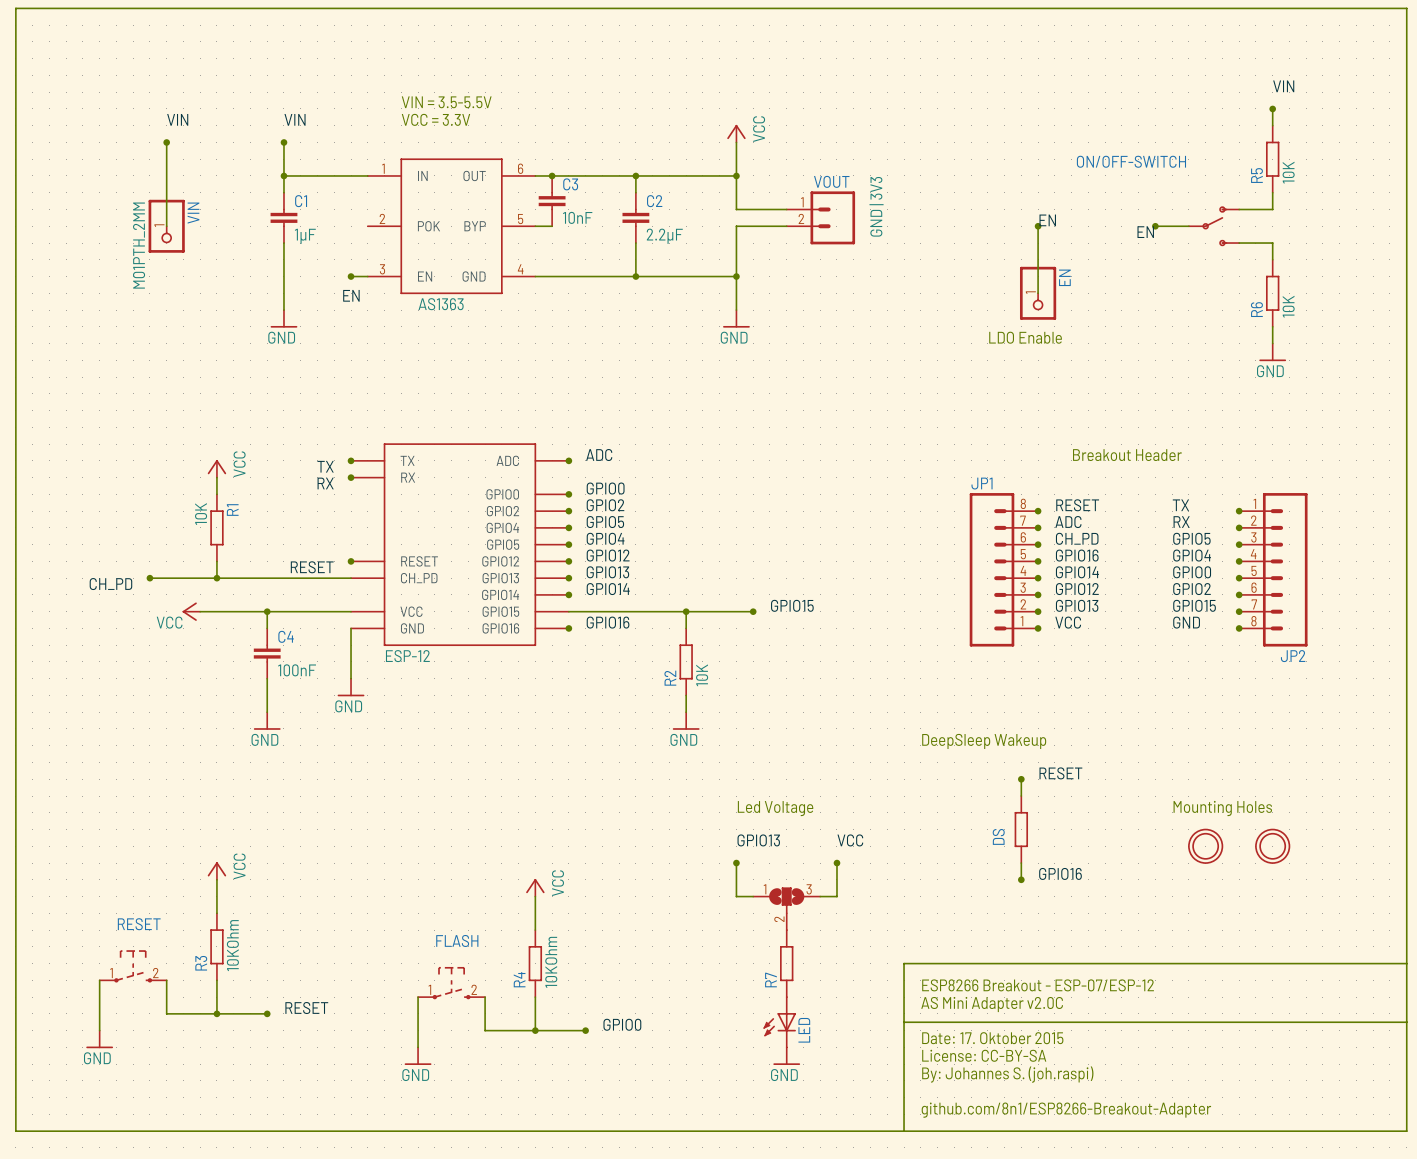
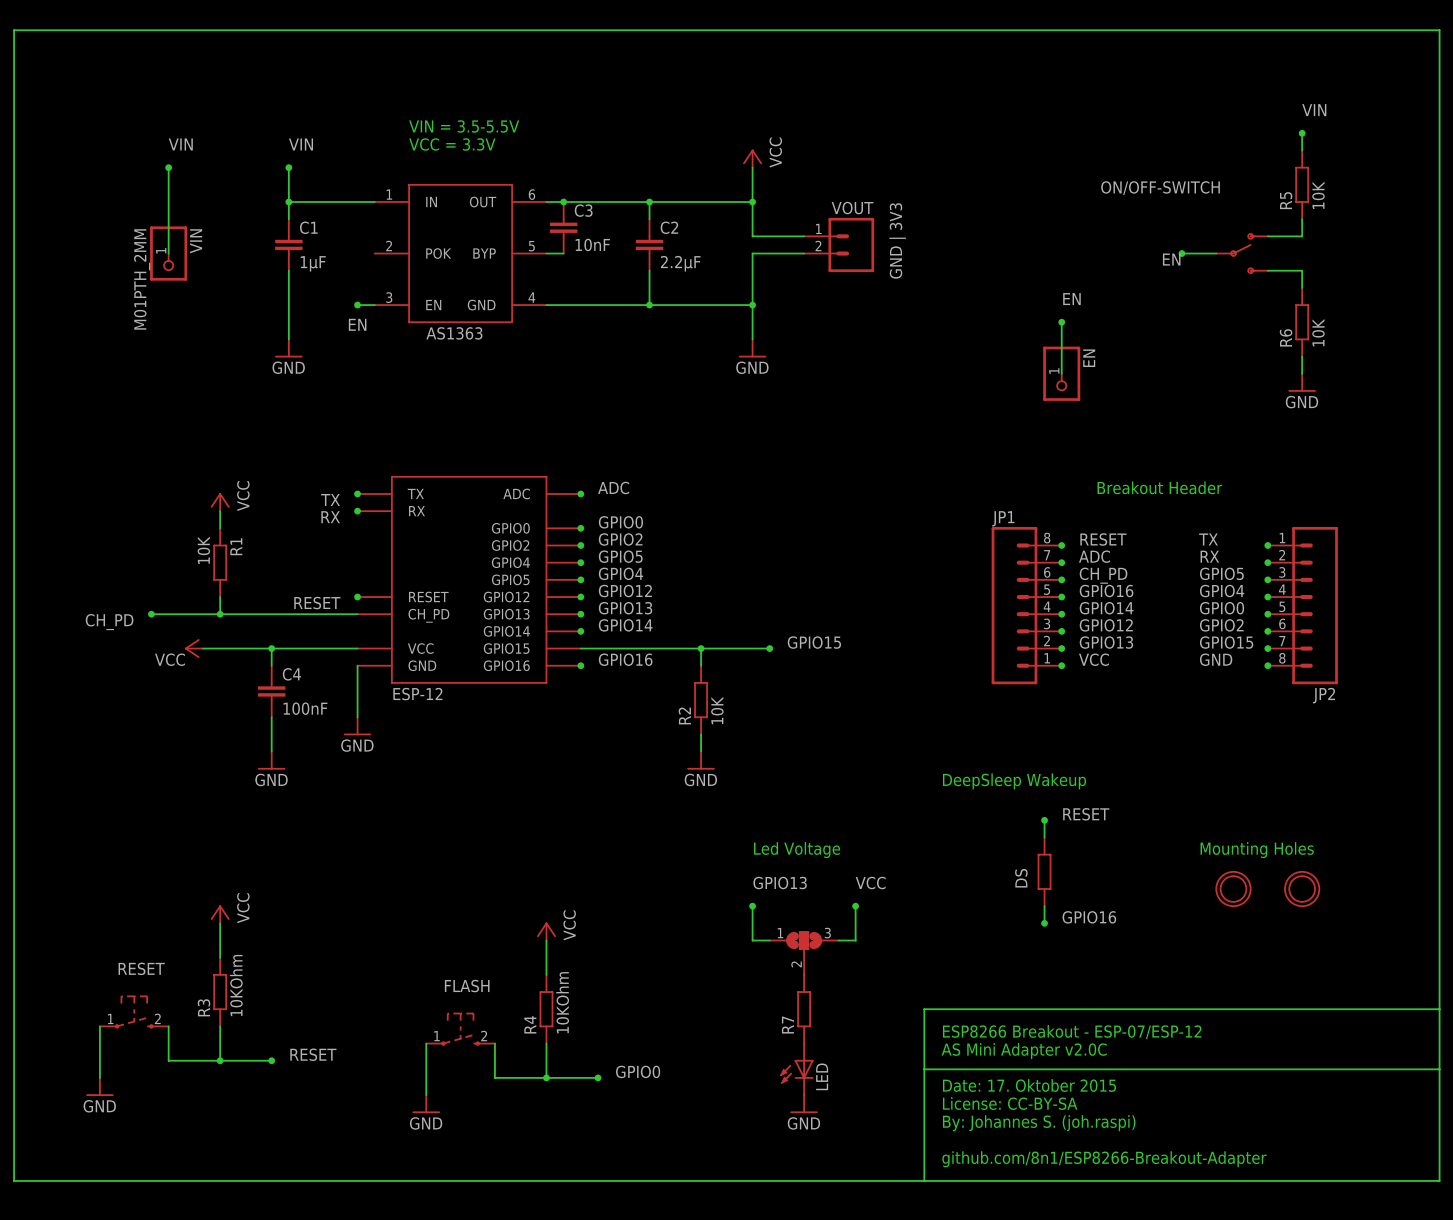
label position: EN (1047, 220) -> EN (1071, 299)
wire: (1038, 226) (1038, 293) -> (1061, 373) (1061, 322)
junction: (1038, 226) -> none
EN position: (1038, 293) -> (1061, 373)
junction: none -> (1061, 322)
text: LDO Enable (1025, 337) -> none

